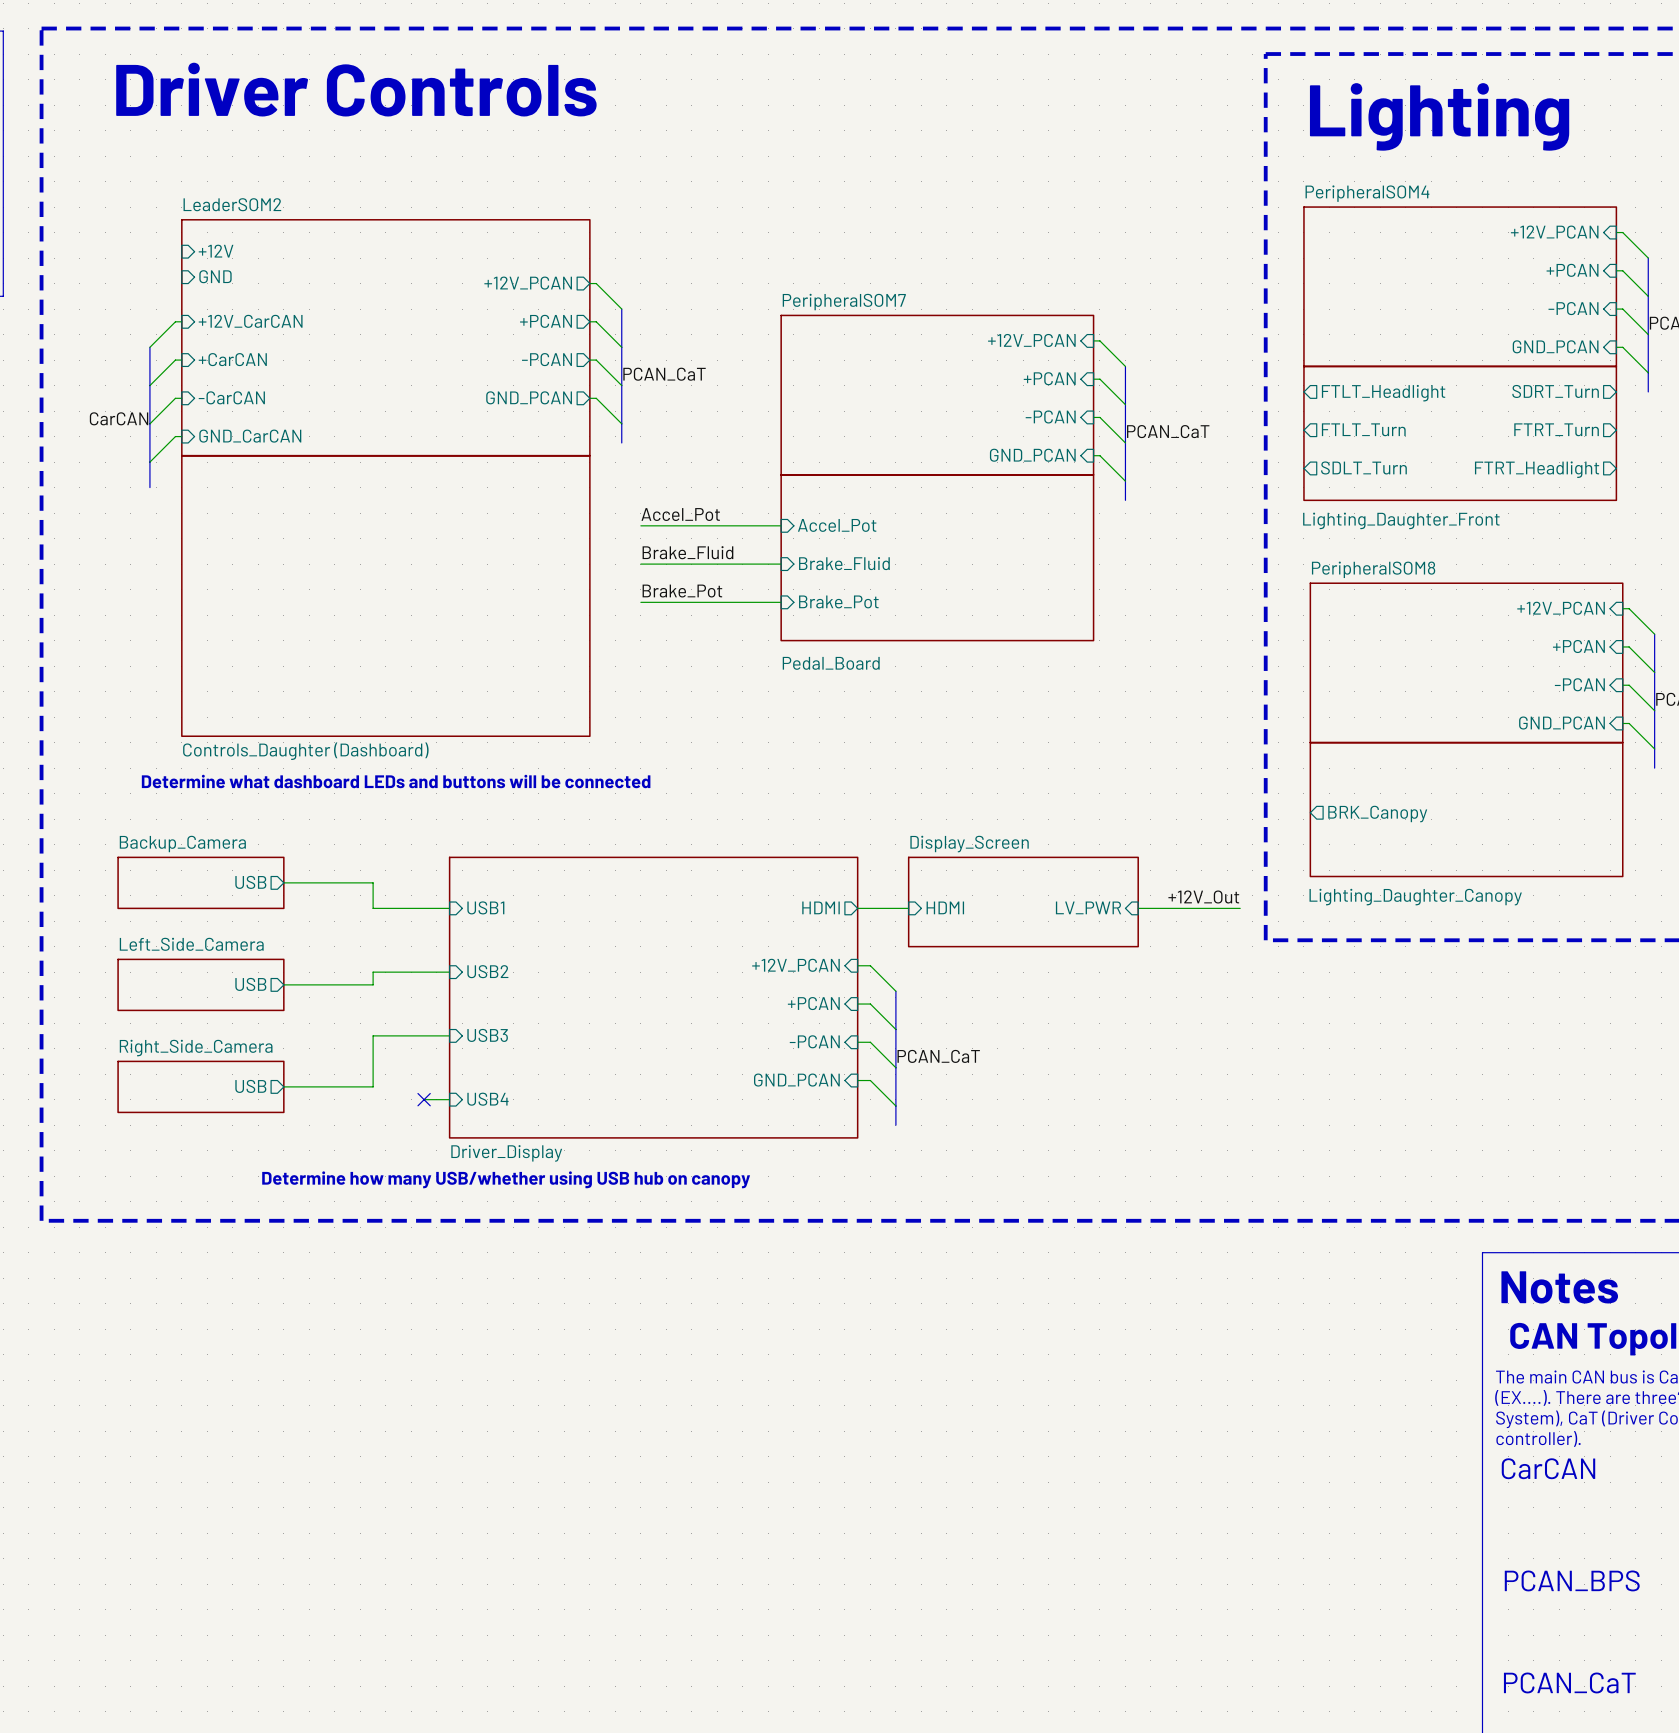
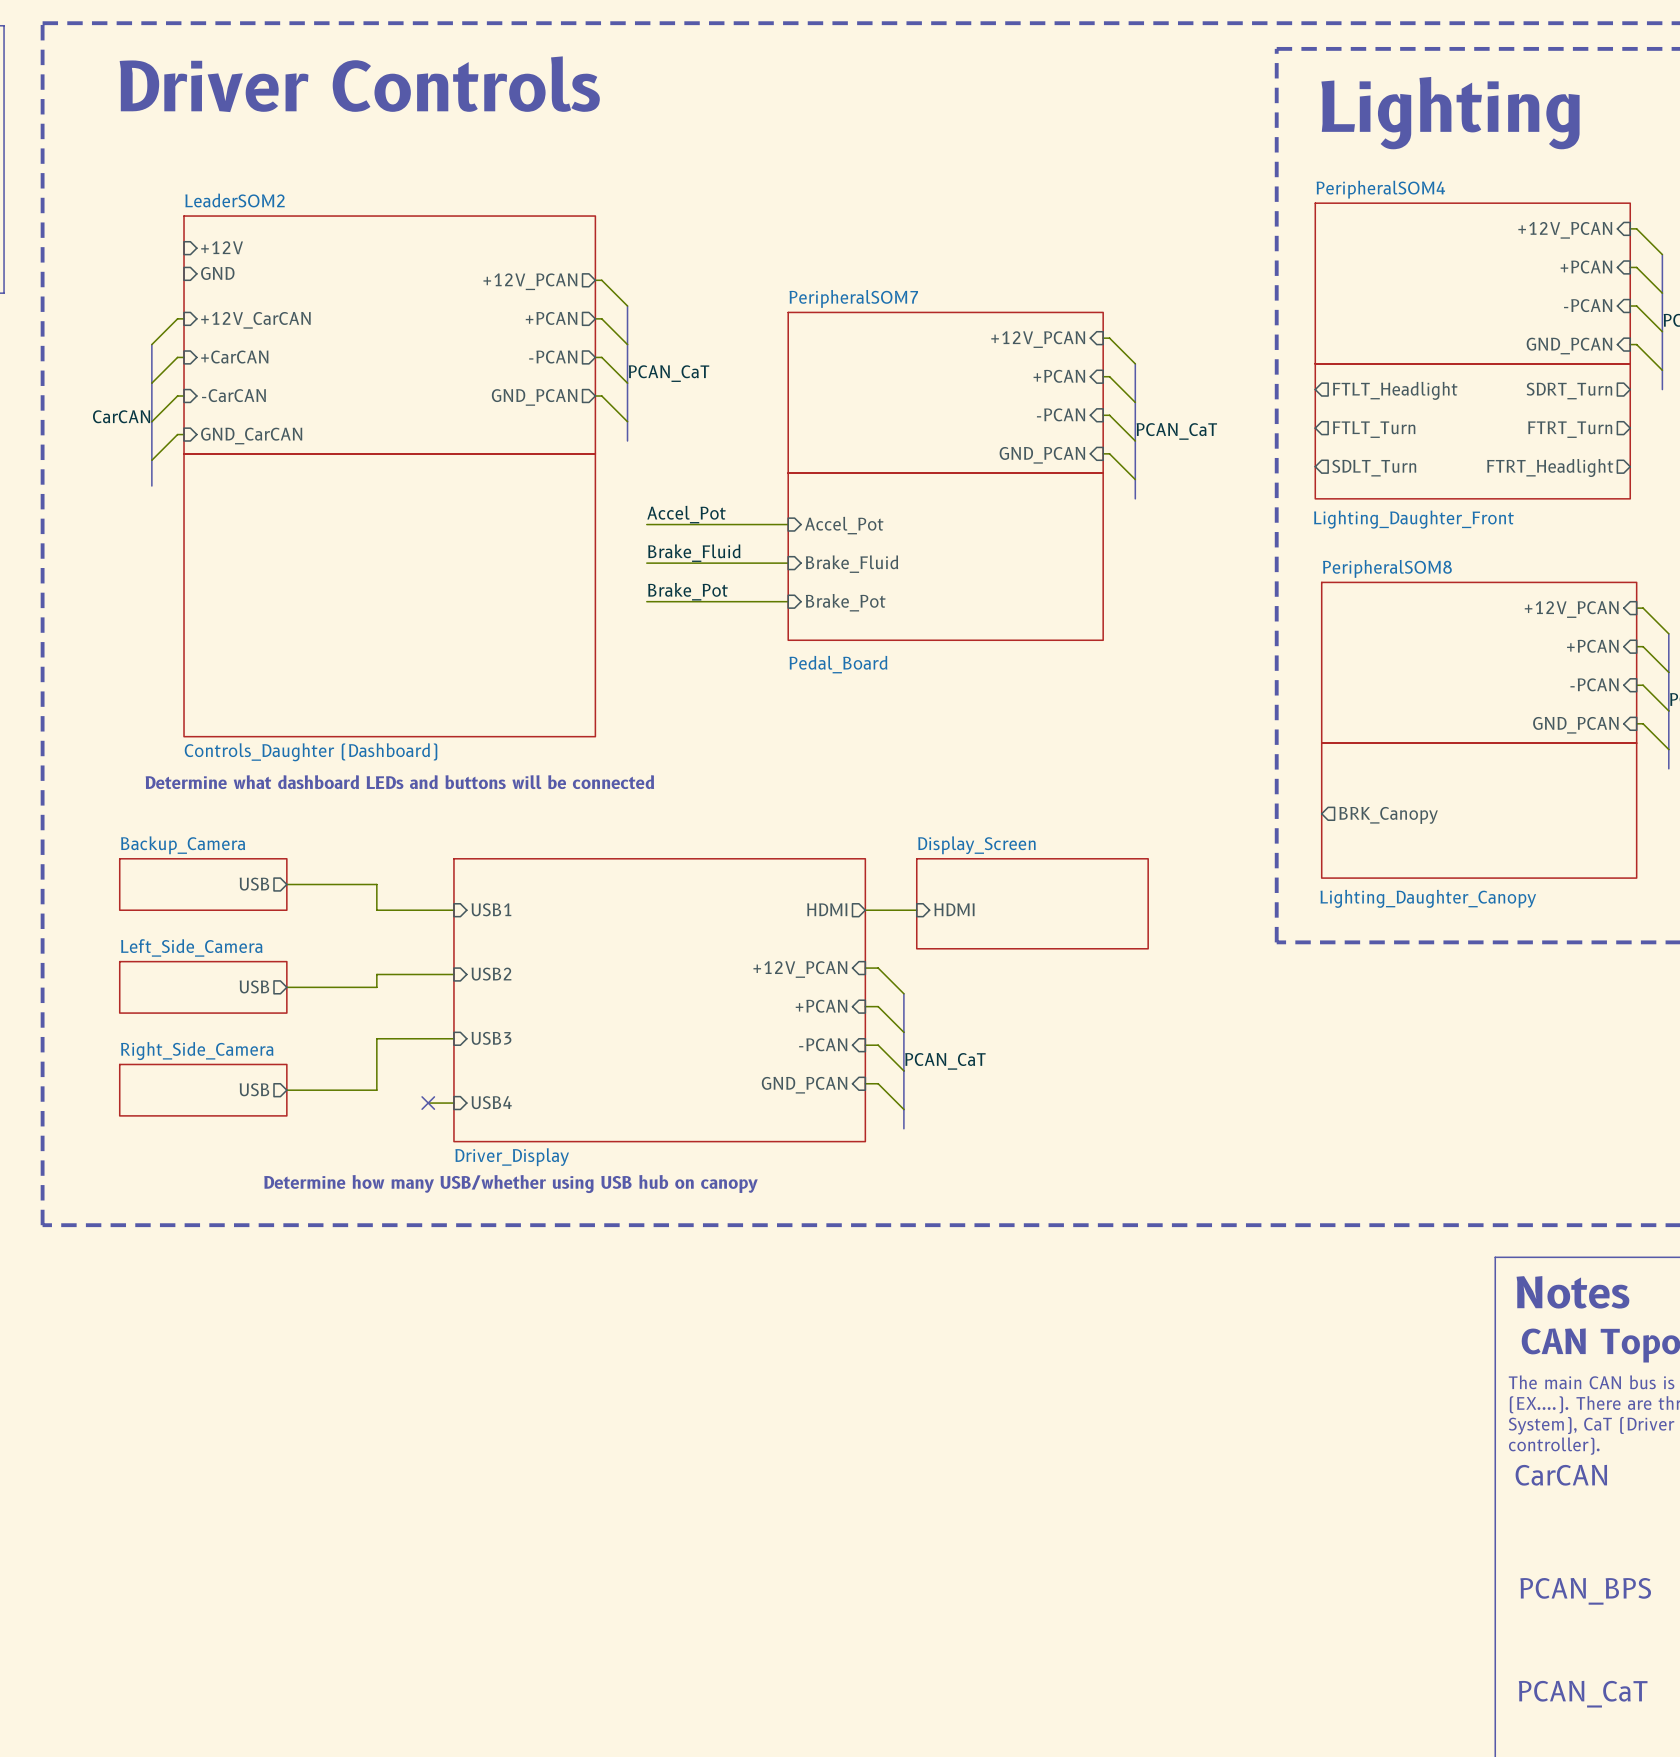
label: +12V_Out (1203, 897) -> none
sheet pin: LV_PWR (1088, 907) -> none
wire: (1138, 908) (1240, 908) -> none

